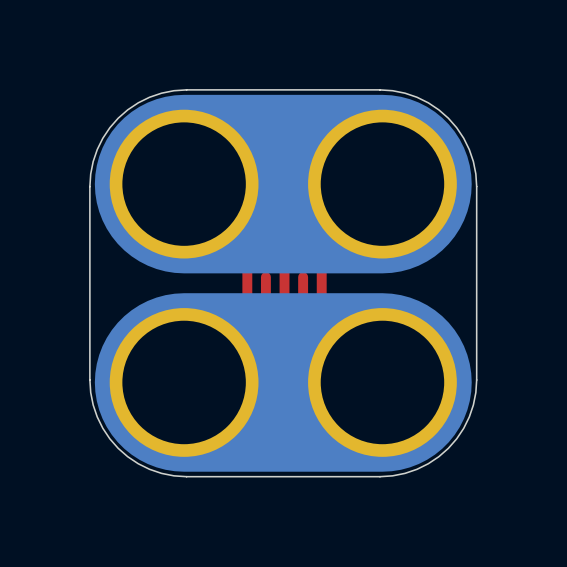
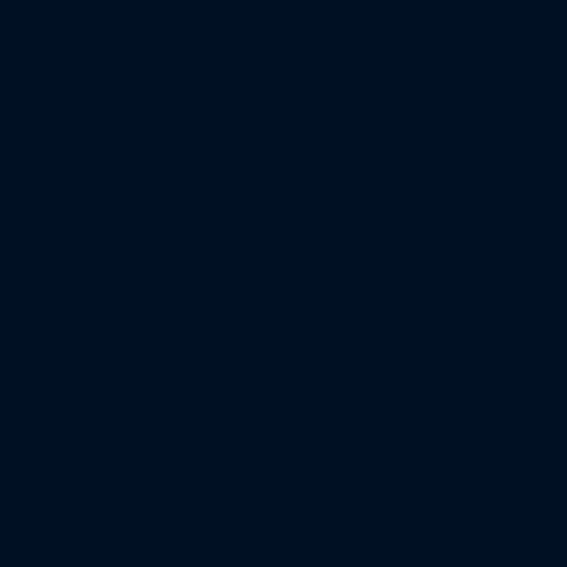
part: (283, 283) -> none

